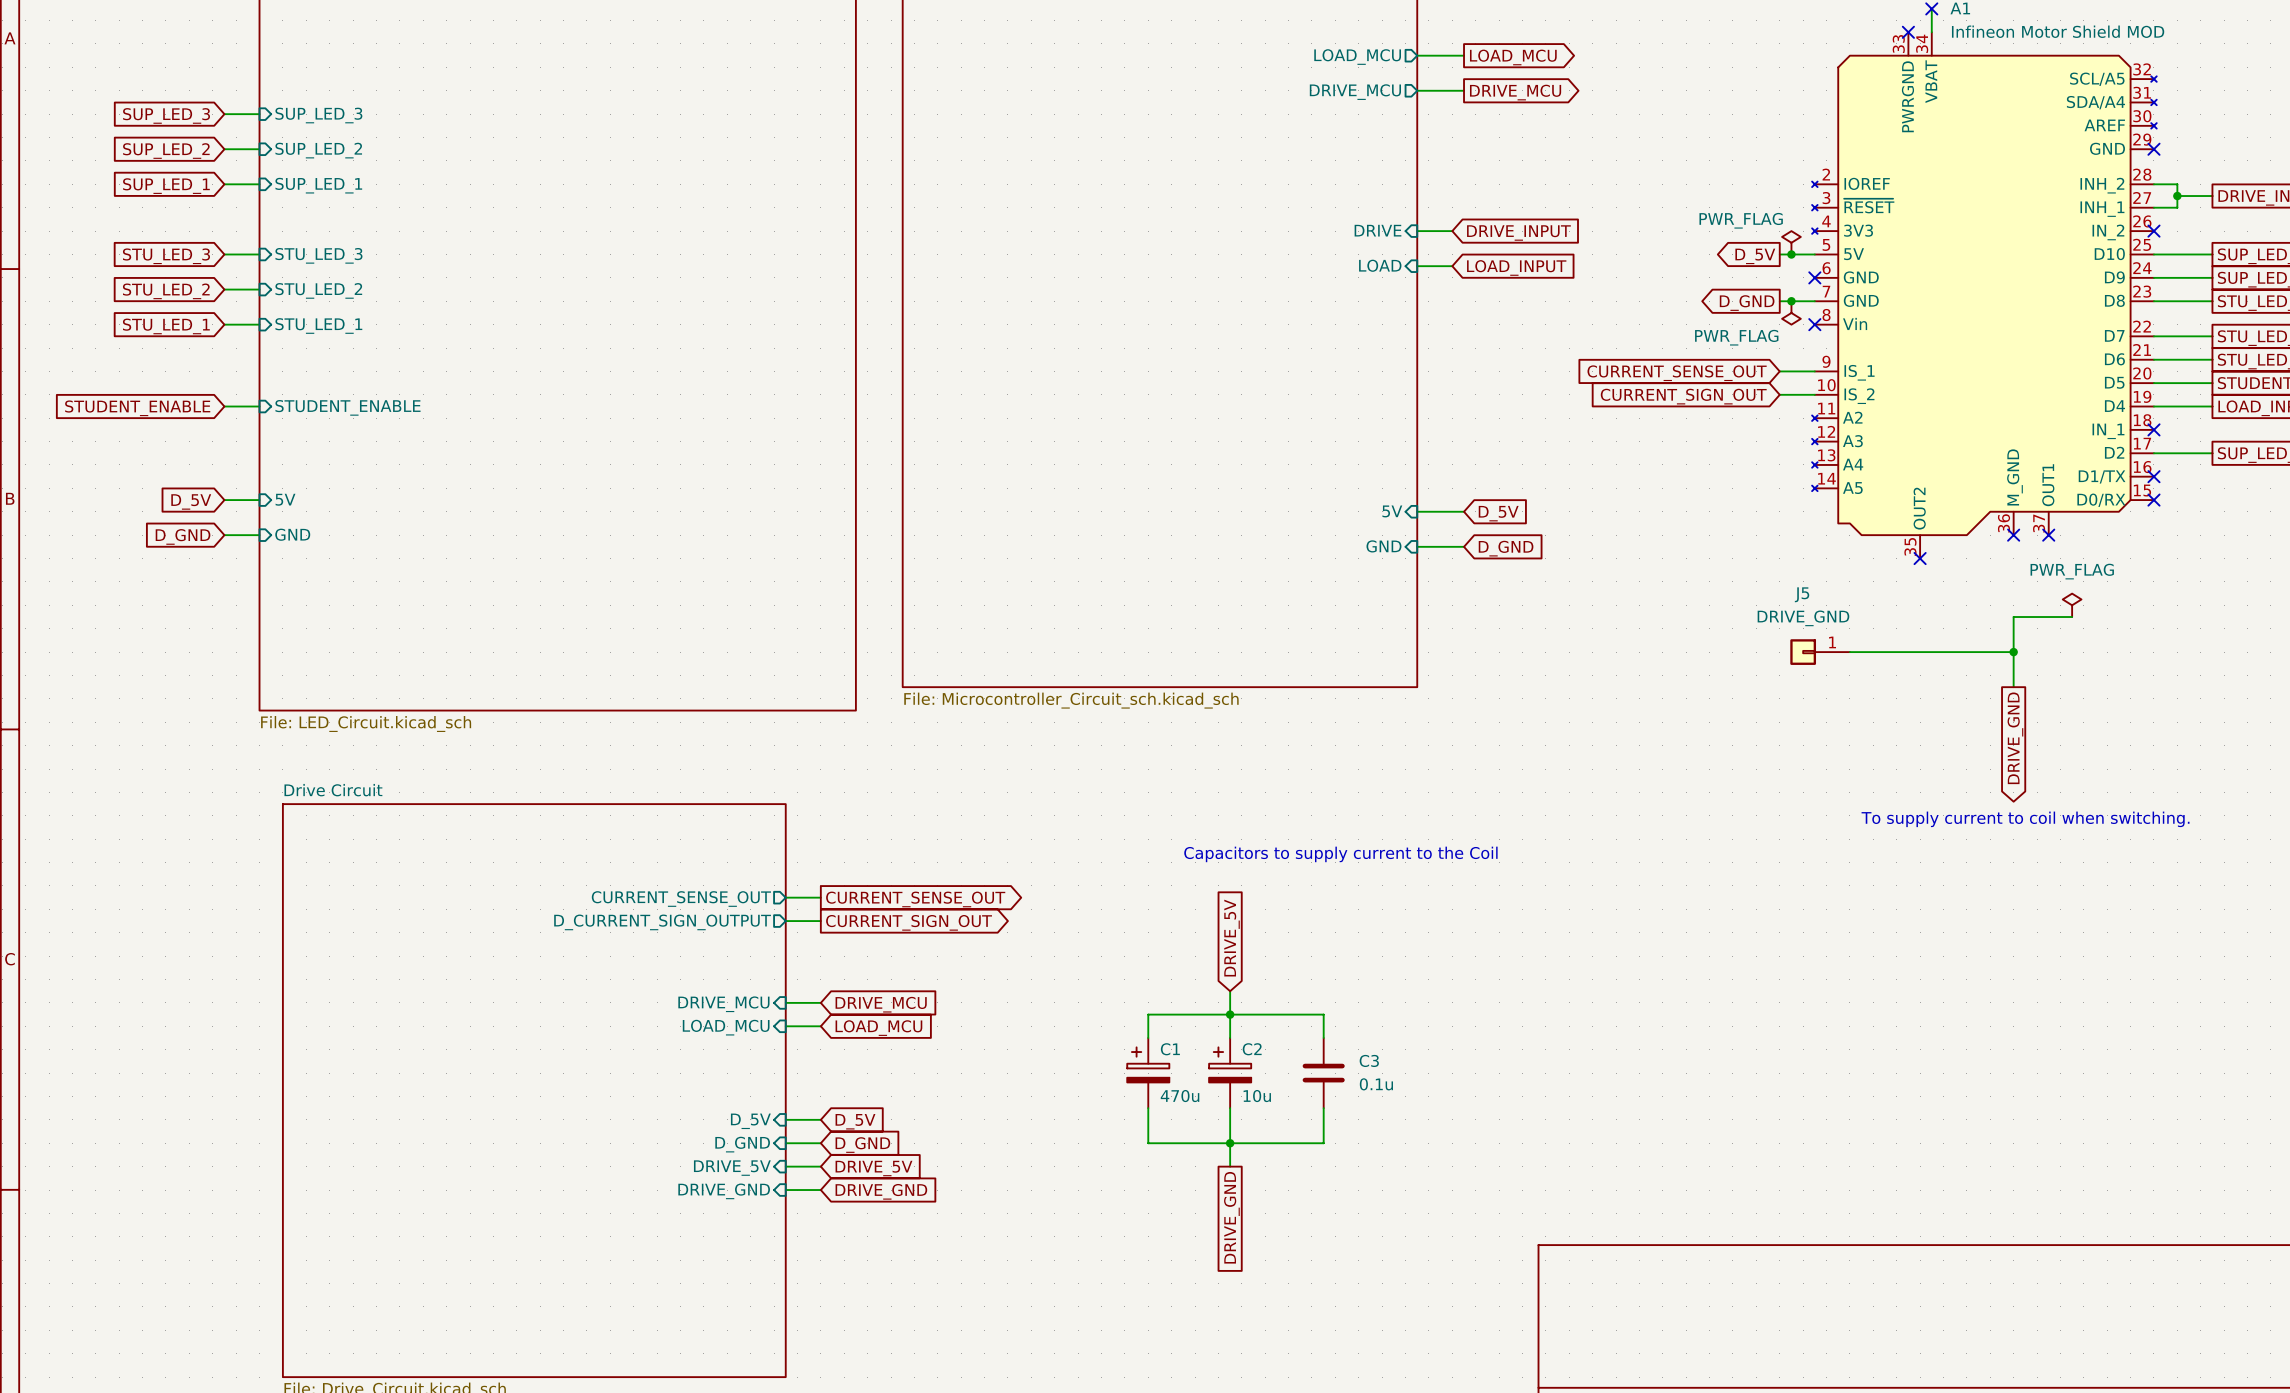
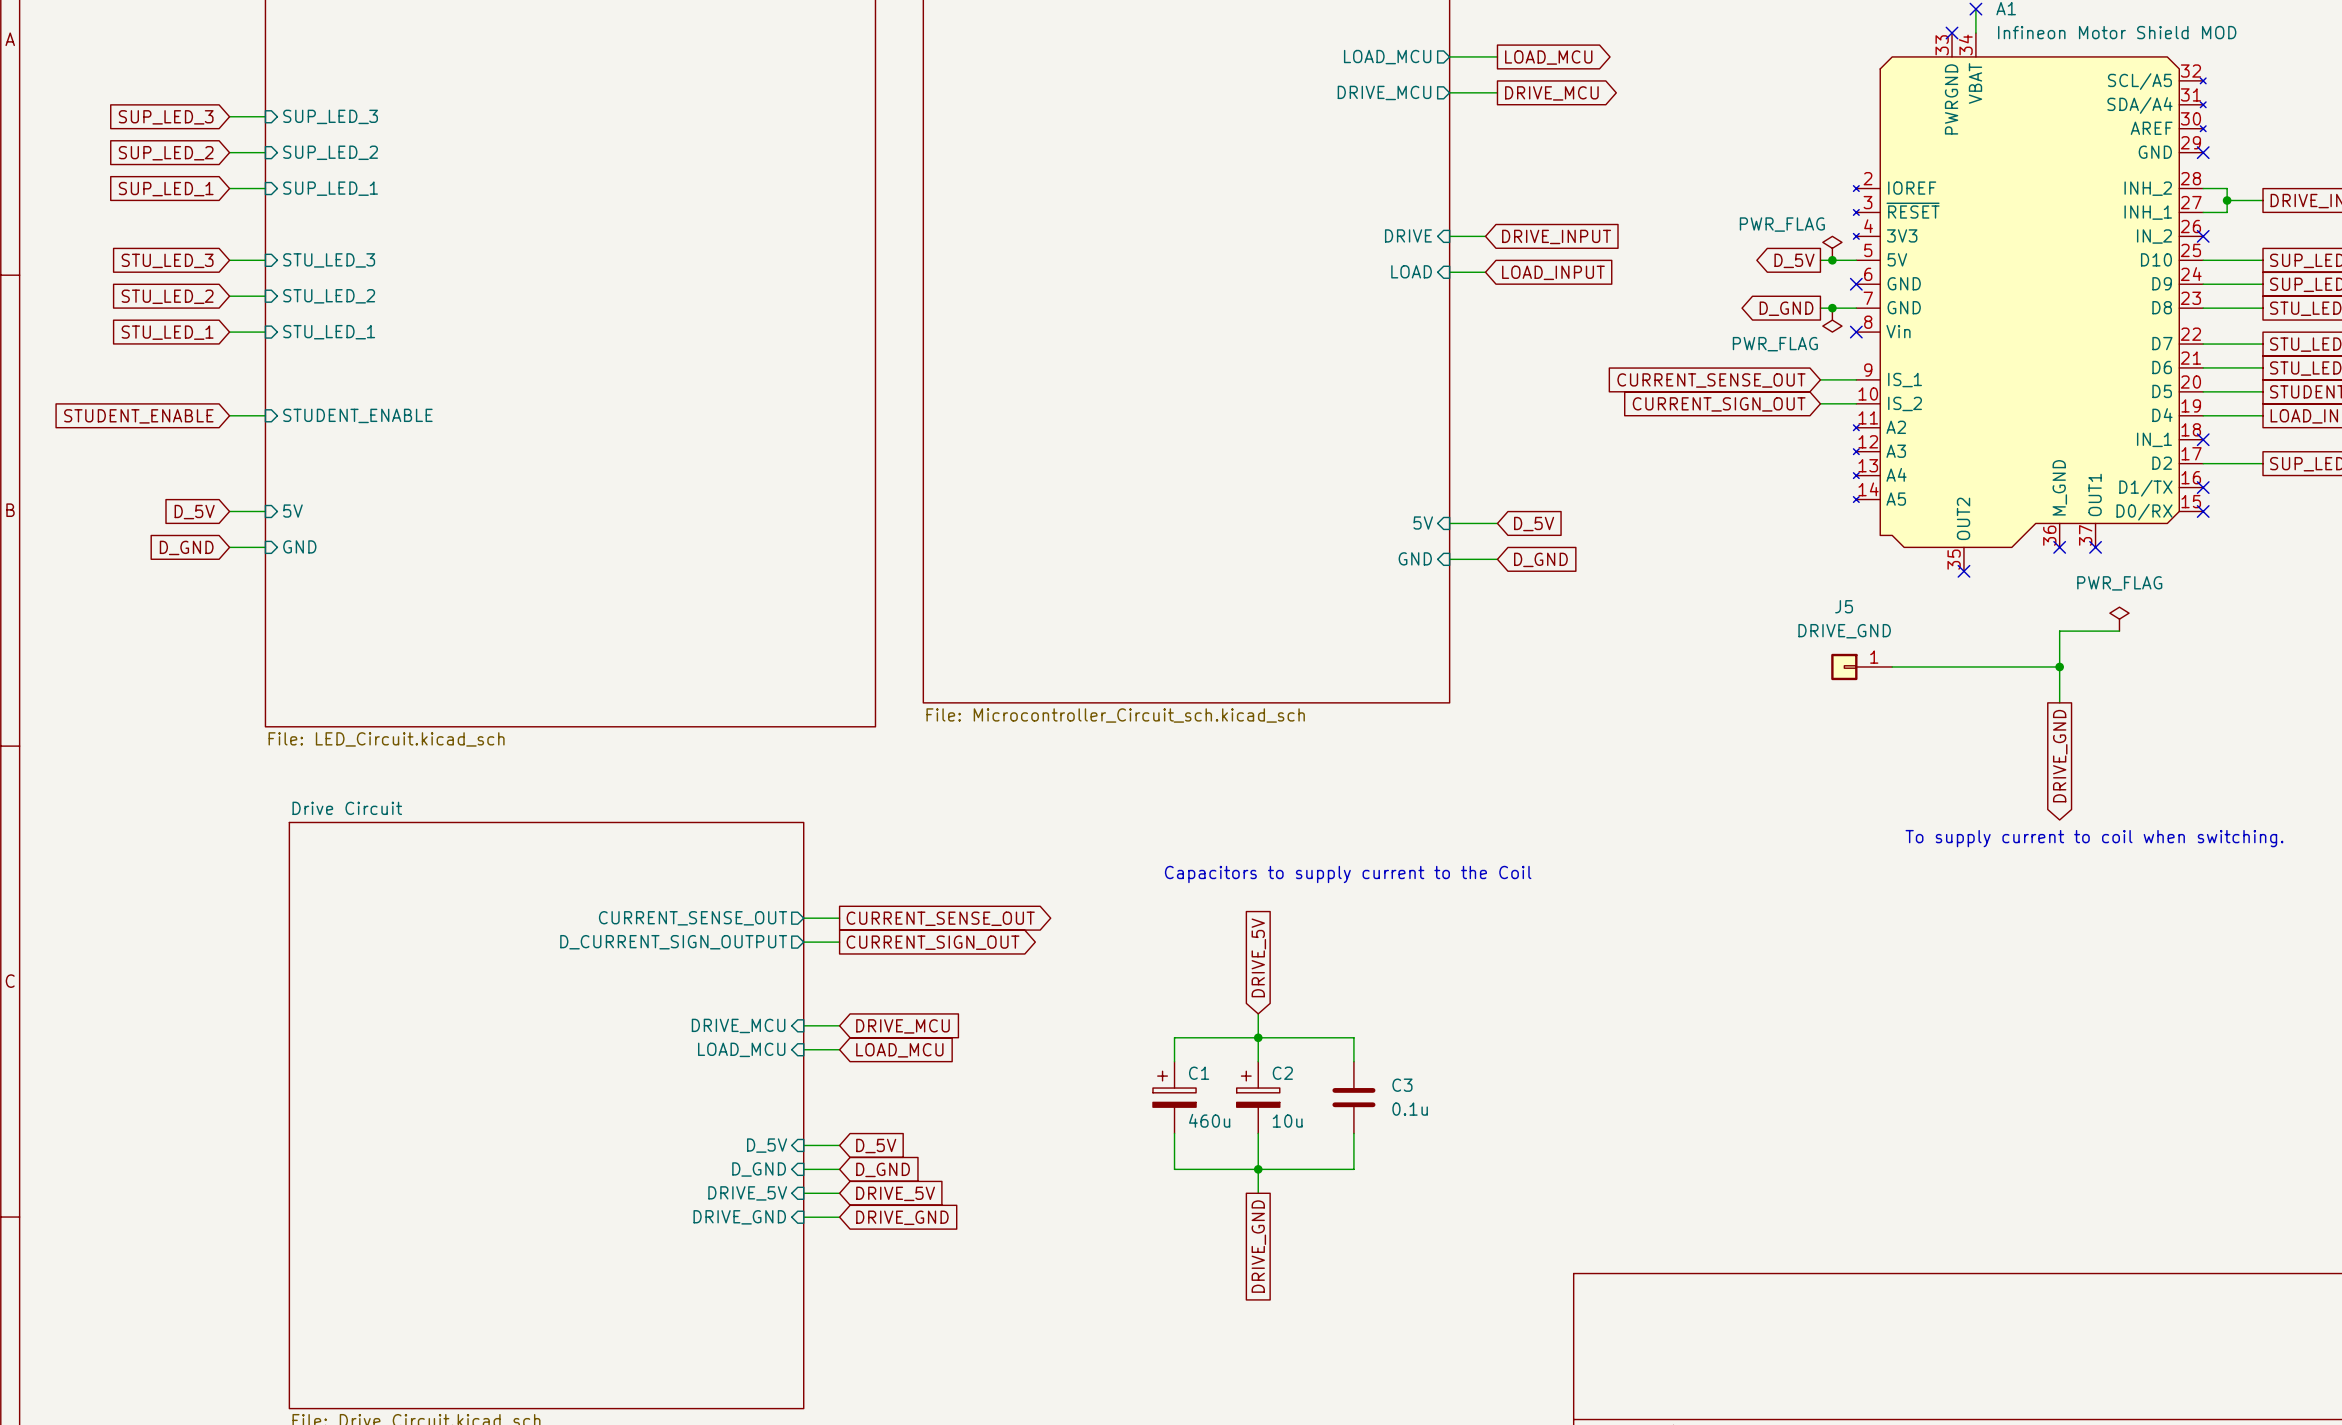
C1 value: 470u (1180, 1096) -> 460u (1209, 1120)

